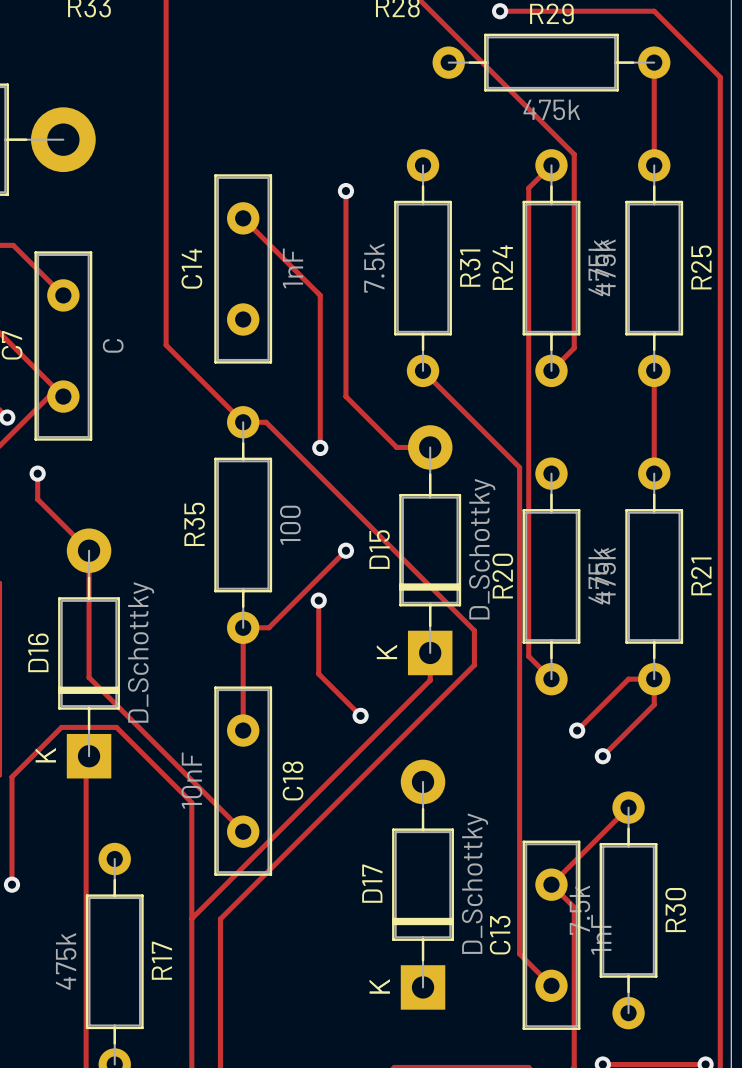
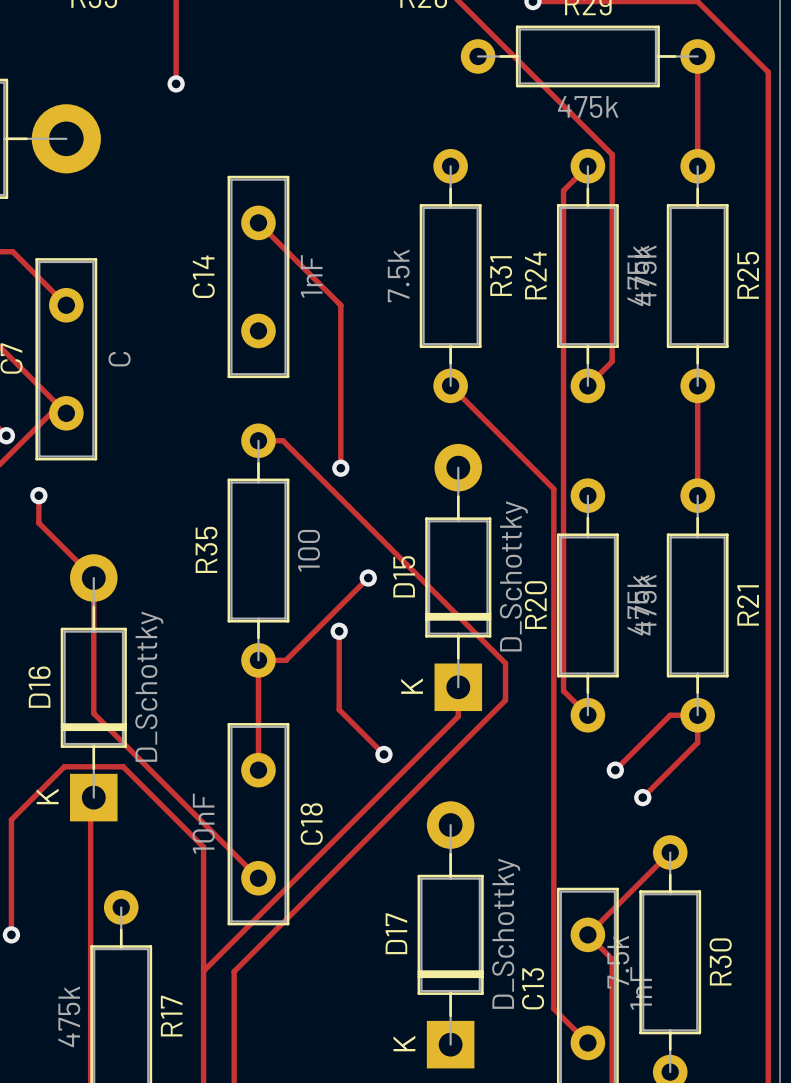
track: (166, 88) (166, 345) (243, 422) -> none
via: none -> (176, 83)
track: (345, 191) (345, 396) (396, 447) (430, 447) -> none
via: (345, 191) -> none

